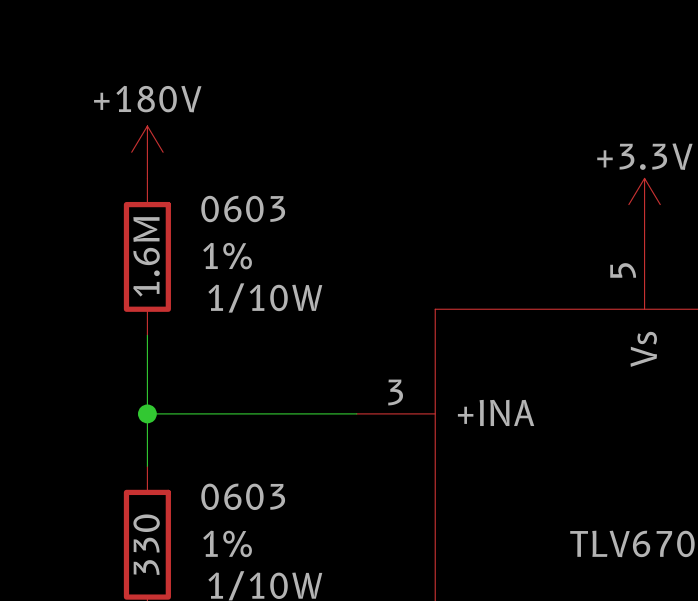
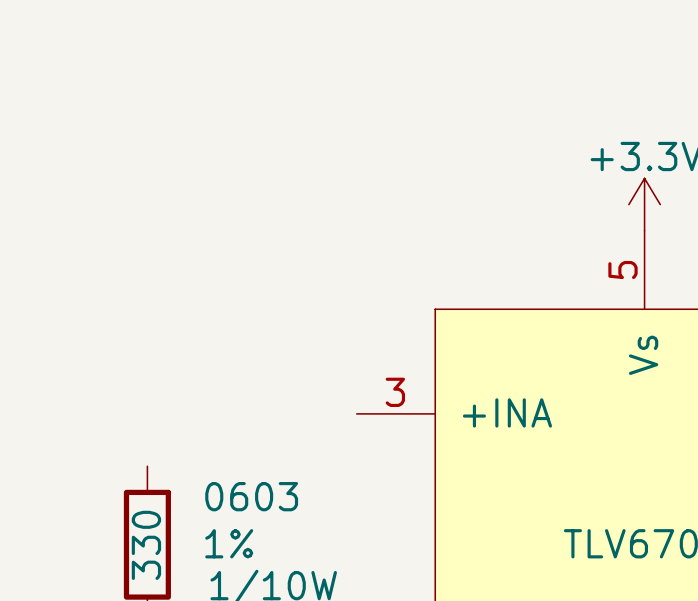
power symbol: +180V (147, 152) -> none
part: 1.6M (147, 256) -> none
wire: (147, 335) (147, 466) -> none
wire: (147, 413) (356, 413) -> none
junction: (147, 413) -> none

